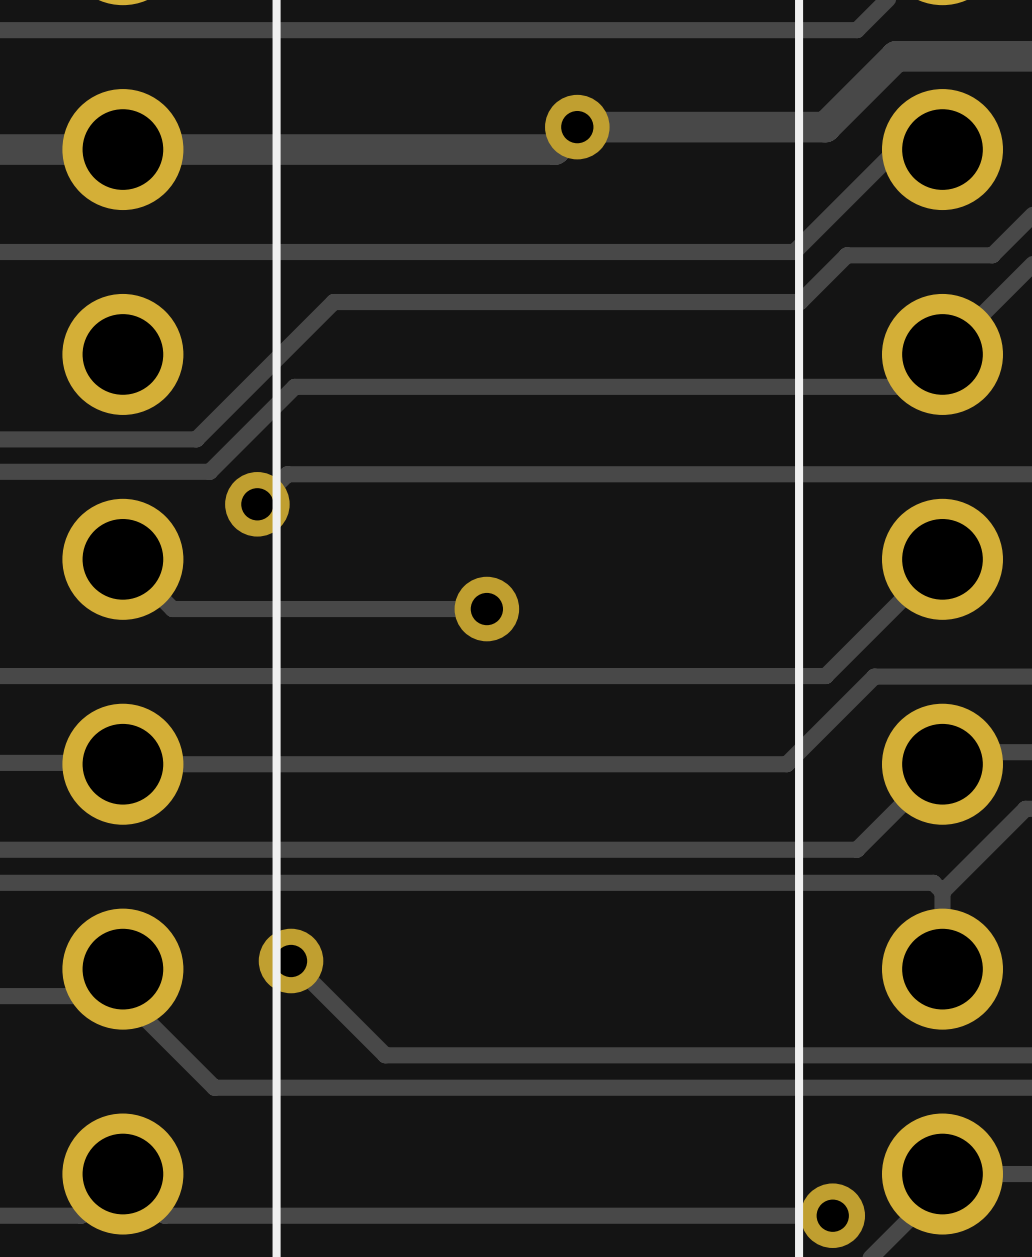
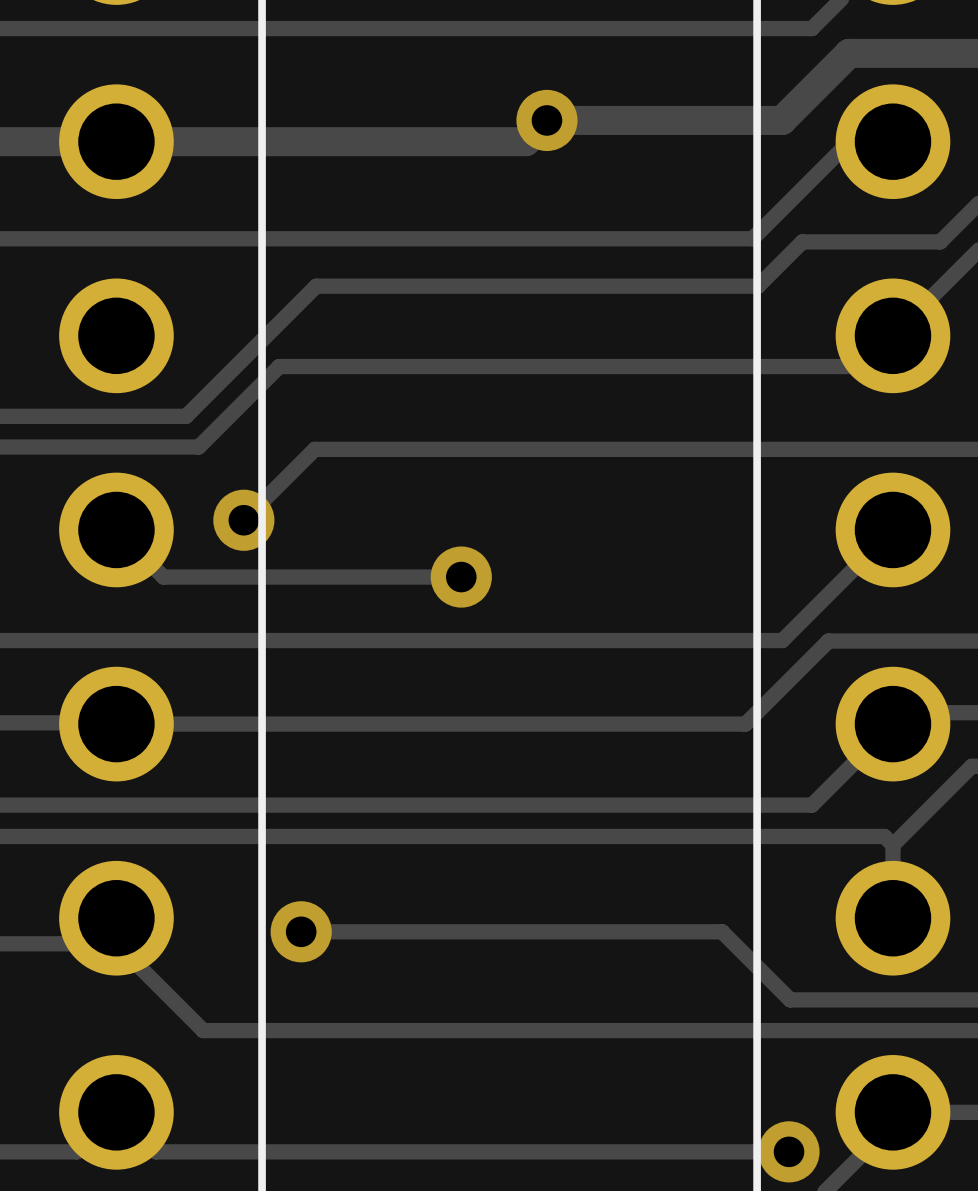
track: (332, 474) (287, 474) (257, 504) -> (314, 449) (243, 520)
via position: (257, 504) -> (243, 520)
track: (291, 961) (385, 1055) (834, 1055) -> (301, 931) (722, 931) (790, 999)
via position: (291, 961) -> (301, 931)

